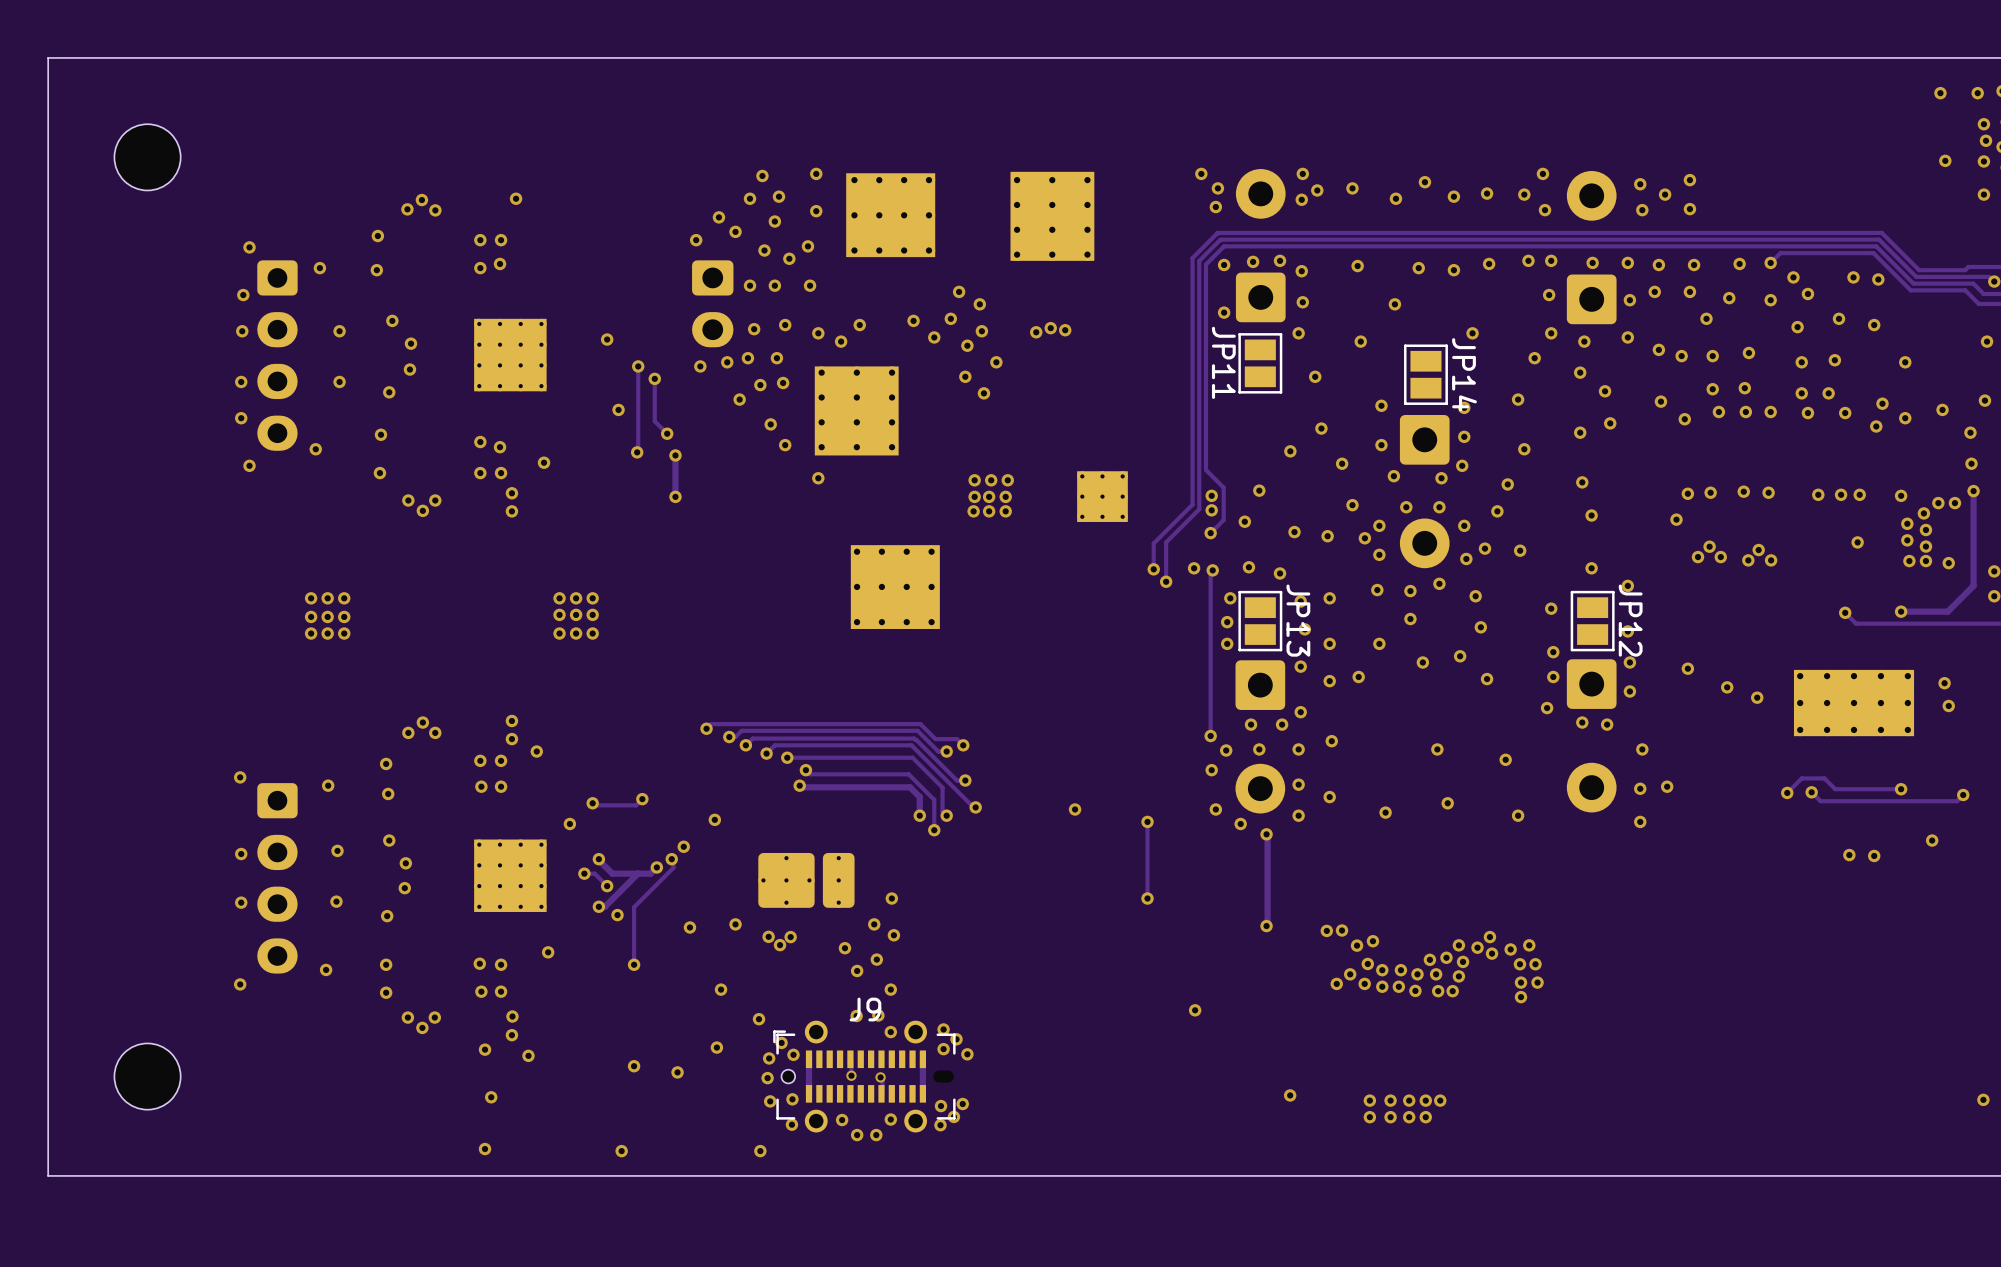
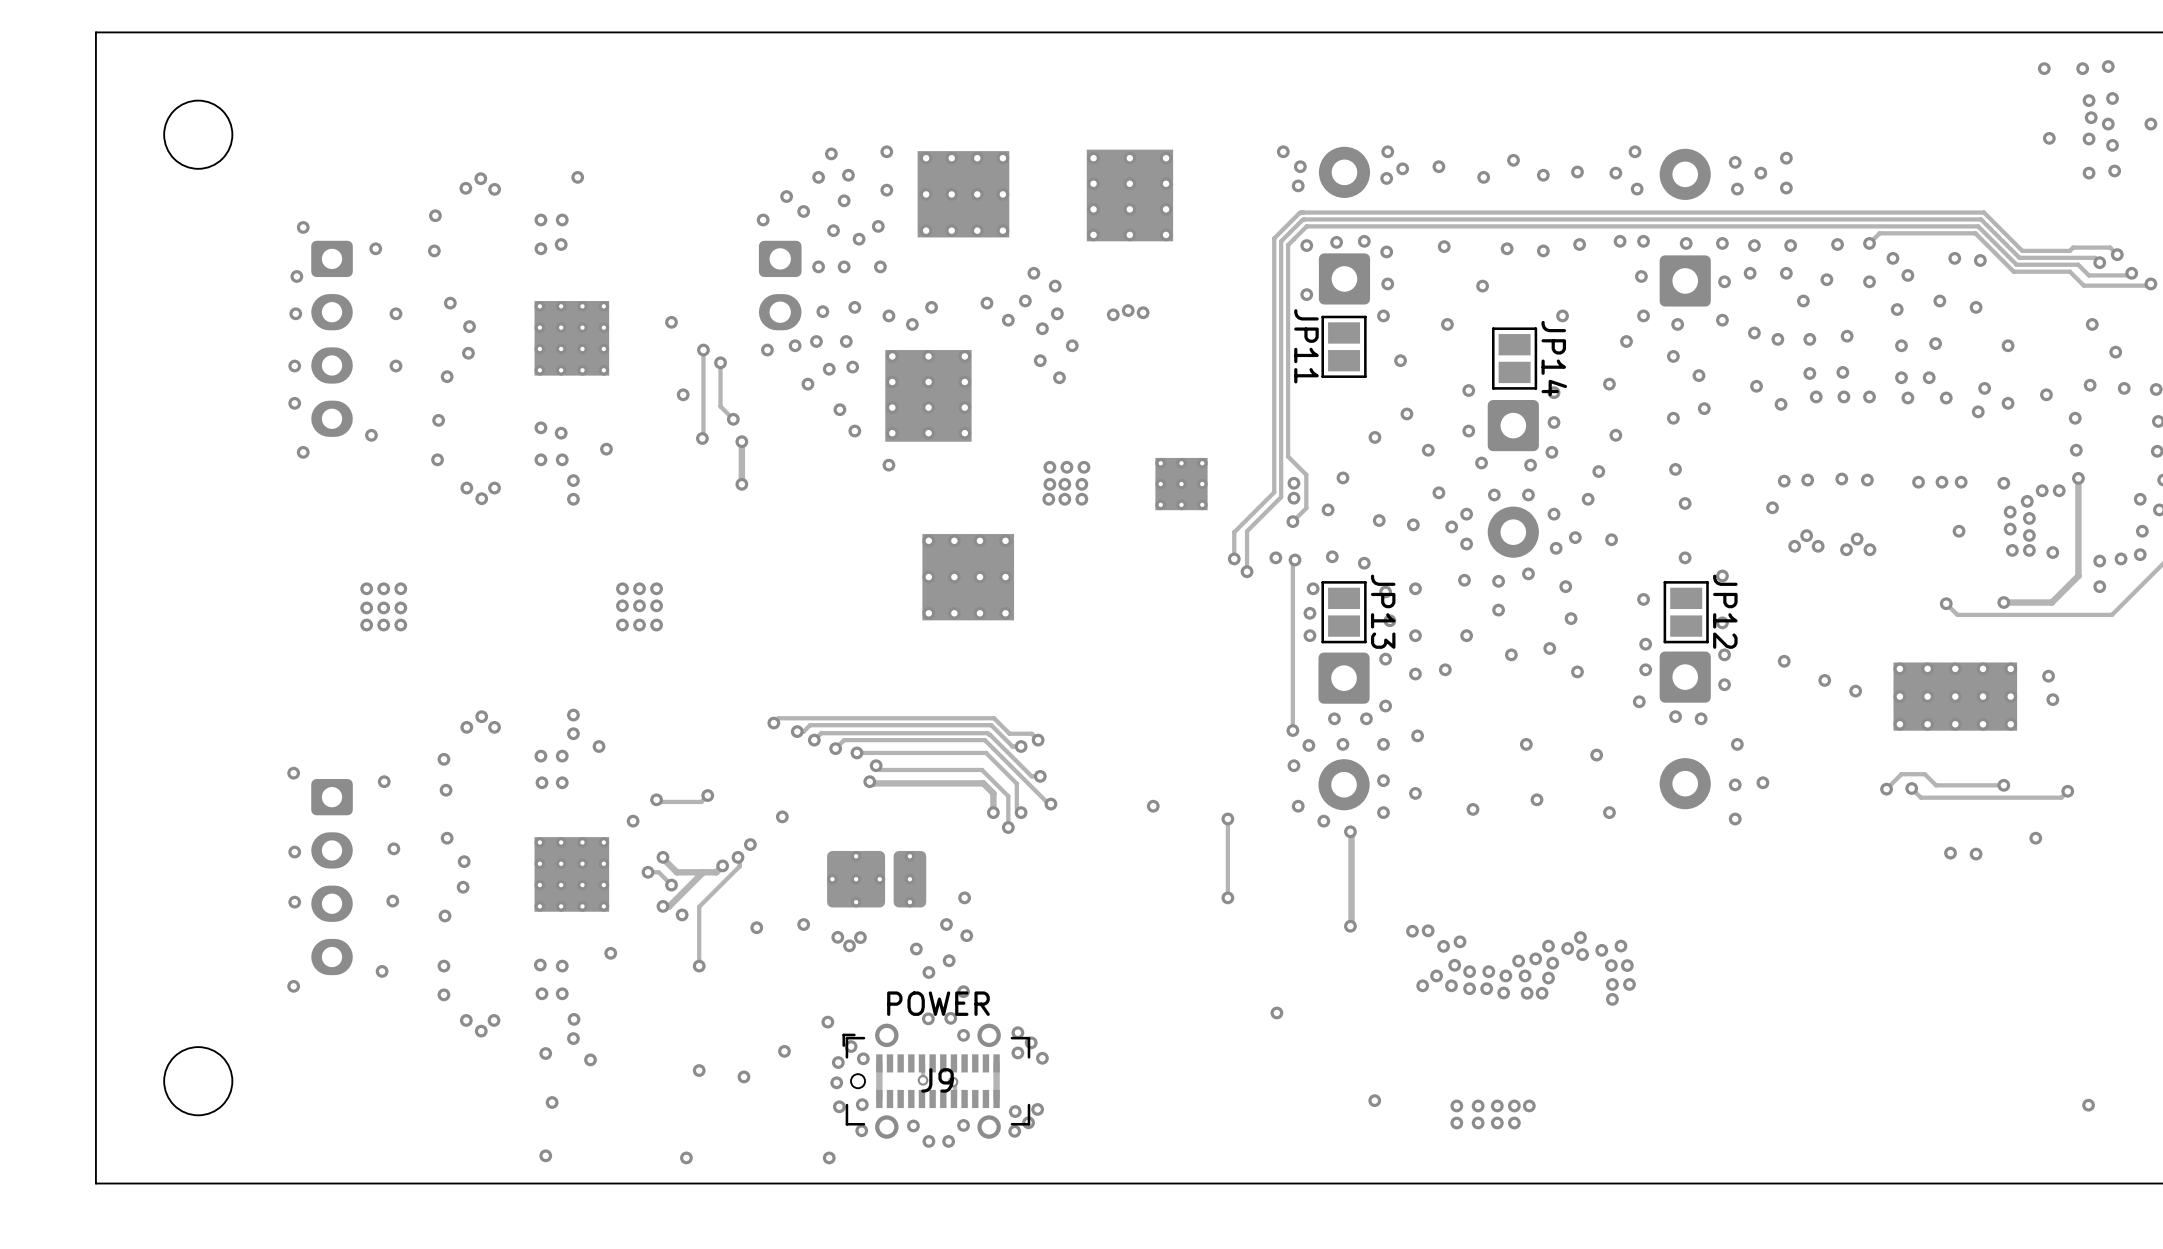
via: (721, 989) -> none
J9 text: none -> POWER (938, 1003)
J9 name position: J9 (865, 1009) -> J9 (937, 1080)

